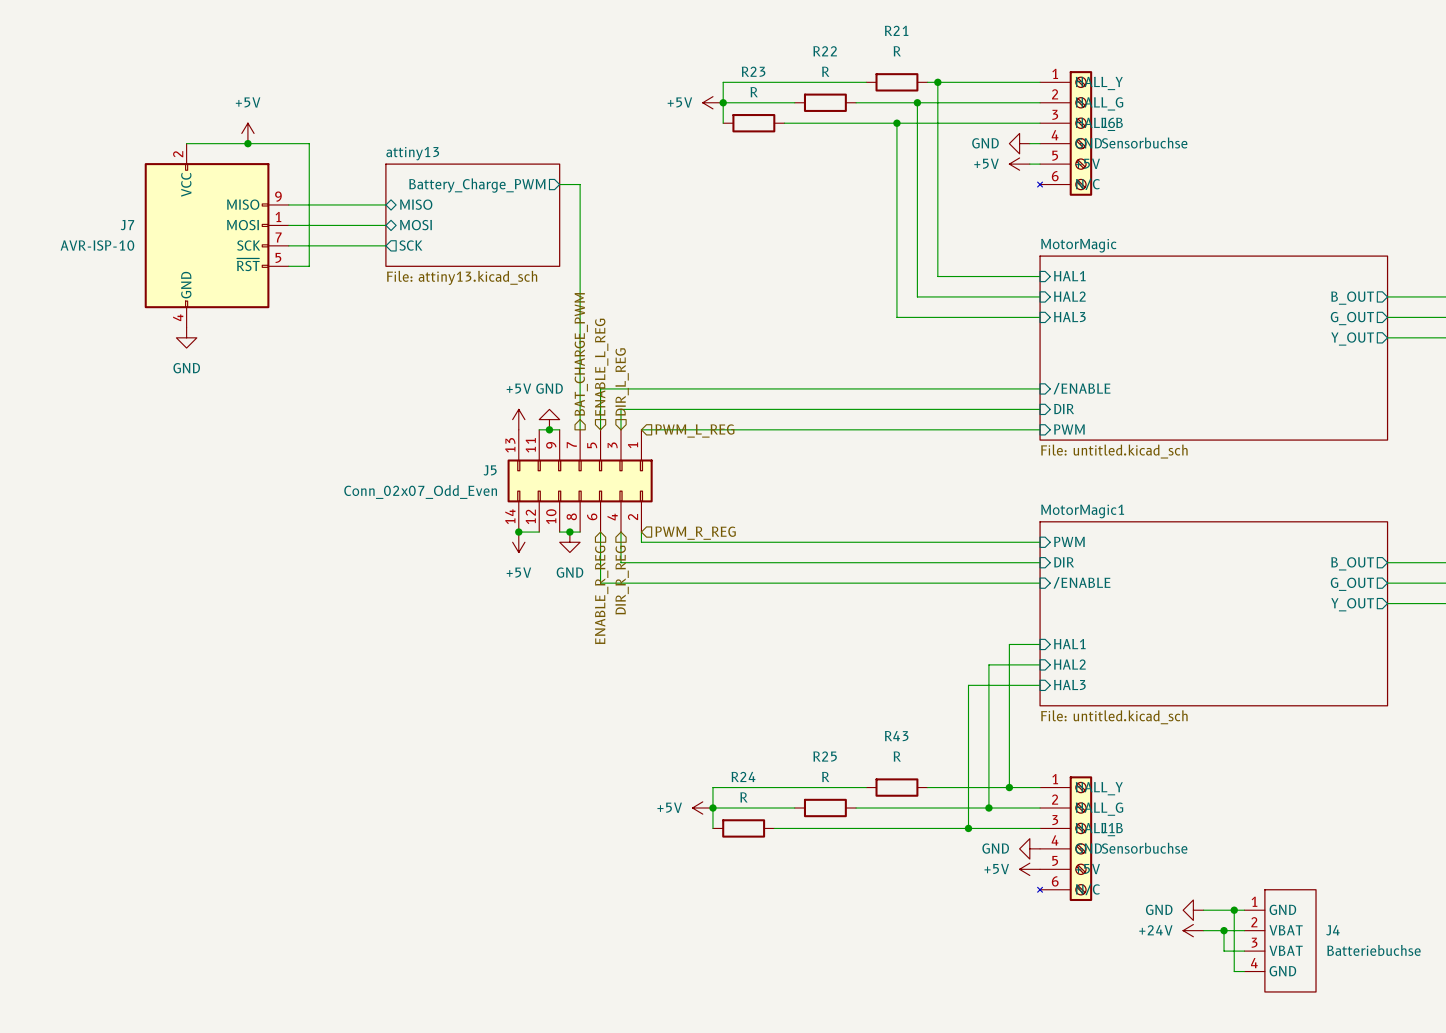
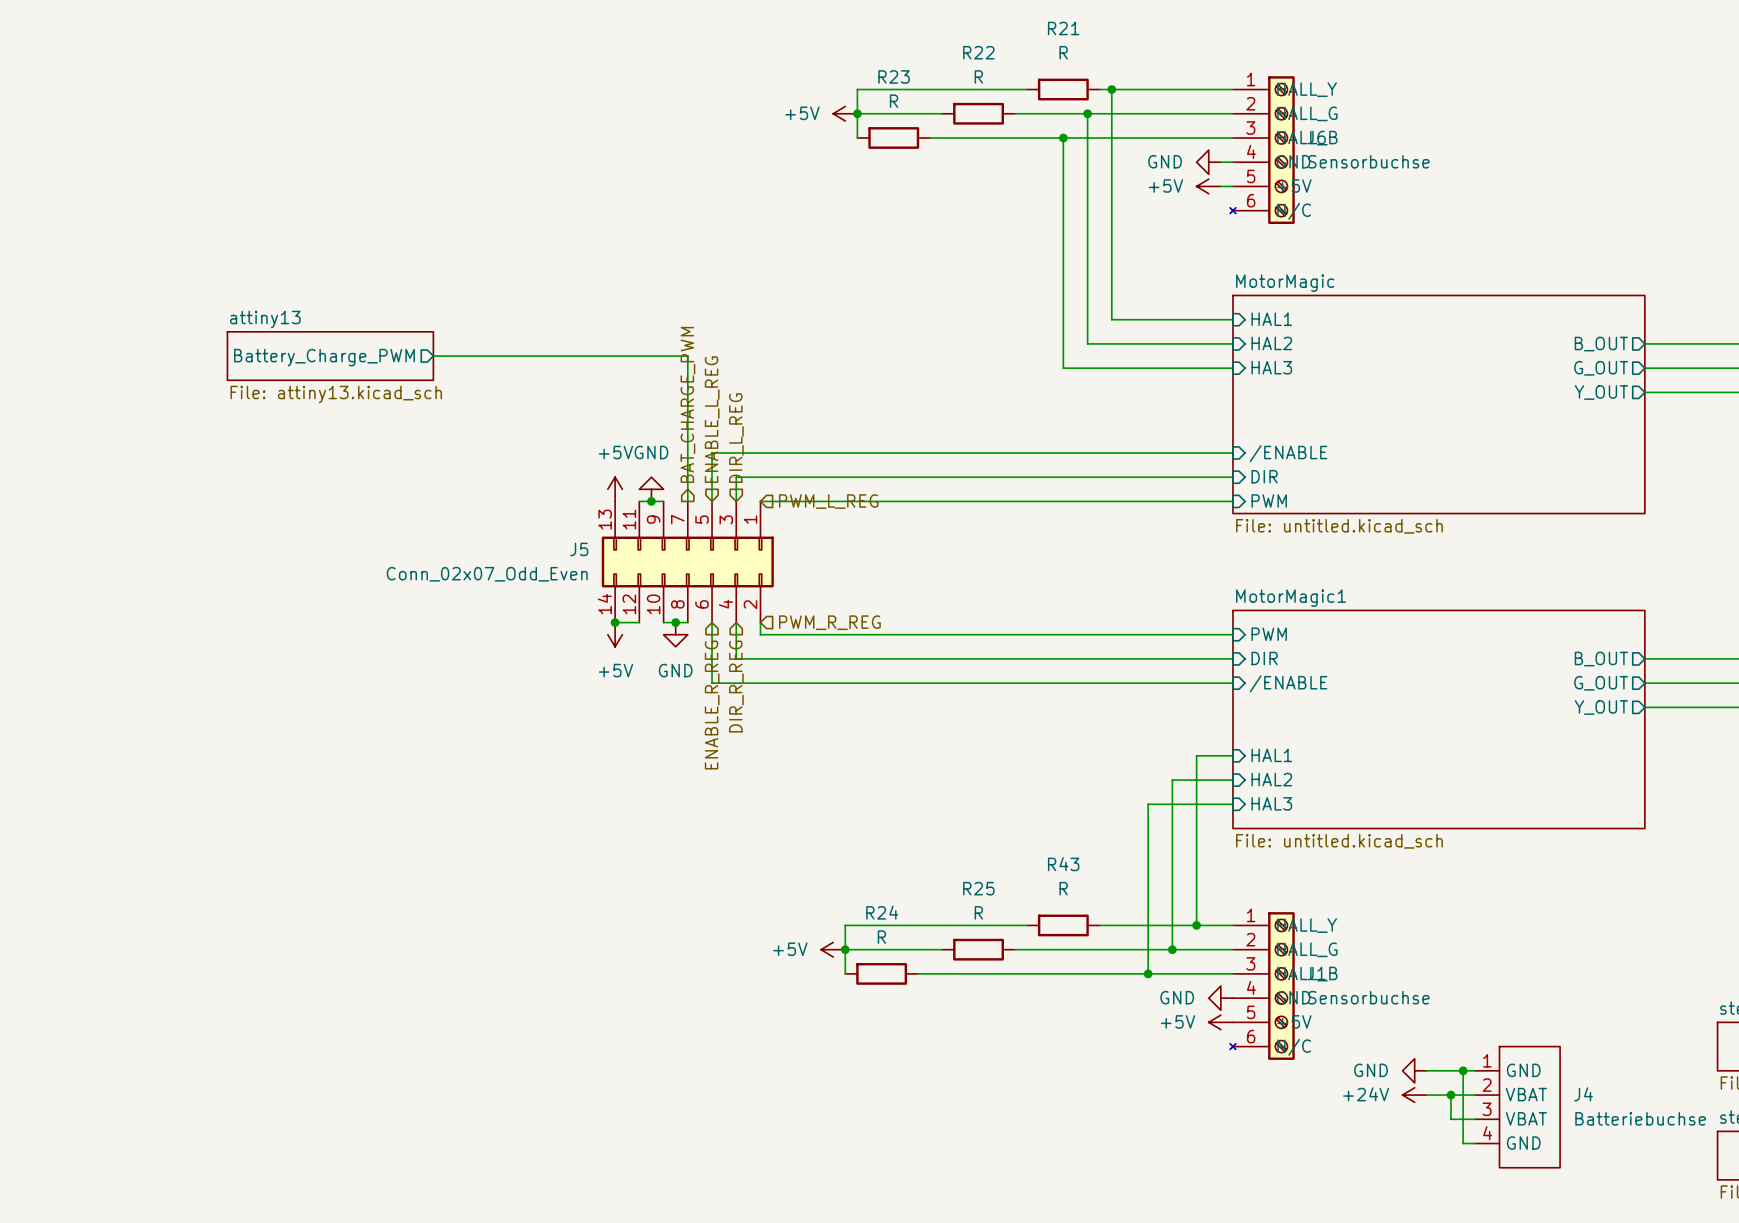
power symbol: +5V (247, 133) -> none
wire: (186, 143) (309, 143) (309, 266) (288, 266) -> none
junction: (247, 143) -> none
sheet attiny13 name position: attiny13 (412, 153) -> attiny13 (265, 319)
sheet attiny13 shape: [385, 163, 561, 267] -> [226, 331, 435, 382]
wire: (559, 184) (580, 184) (580, 307) -> (433, 356) (687, 356)
sheet pin: Battery_Charge_PWM (477, 185) -> none
wire: (288, 204) (385, 204) -> none
sheet pin: MISO (416, 204) -> none
wire: (288, 225) (385, 225) -> none
sheet pin: MOSI (415, 225) -> none
J7: AVR-ISP-10 (216, 235) -> none
wire: (288, 245) (385, 245) -> none
sheet pin: SCK (410, 245) -> none
sheet attiny13 value position: File: attiny13.kicad_sch (462, 277) -> File: attiny13.kicad_sch (336, 394)
sheet pin: none -> Battery_Charge_PWM (324, 357)
power symbol: GND (186, 337) -> none

